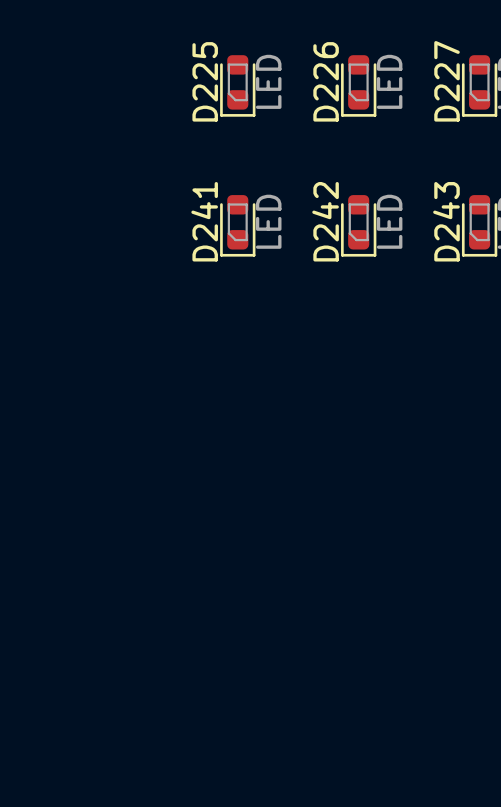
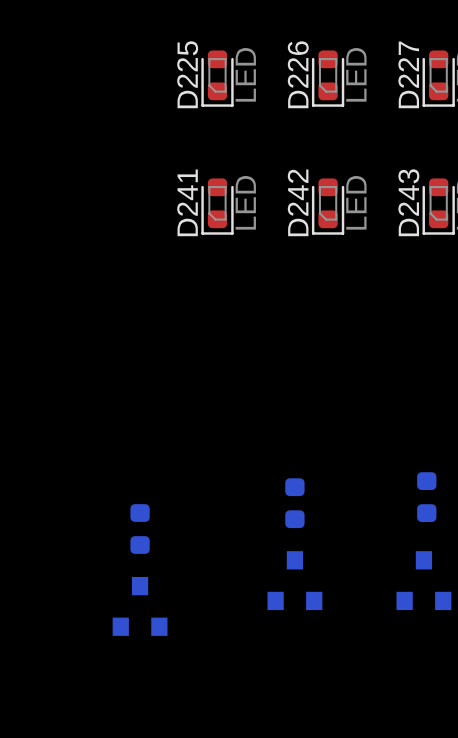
part: none -> (426, 497)
part: none -> (294, 503)
part: none -> (140, 529)
part: none -> (294, 580)
part: none -> (423, 580)
part: none -> (140, 606)

